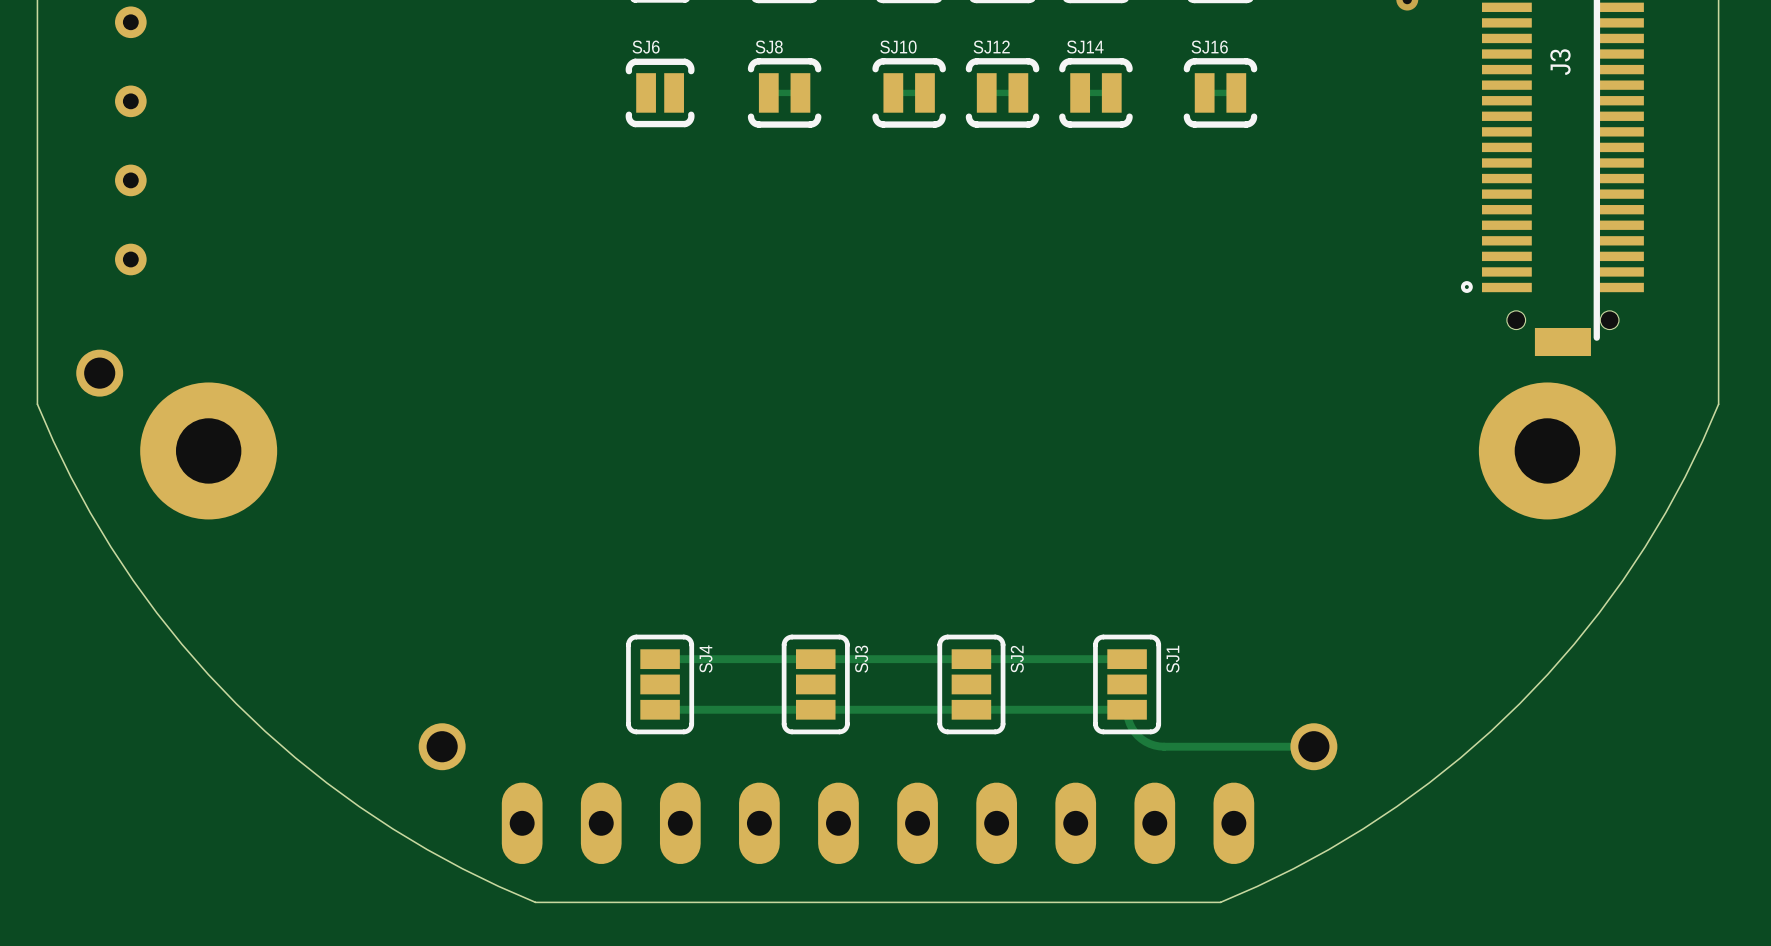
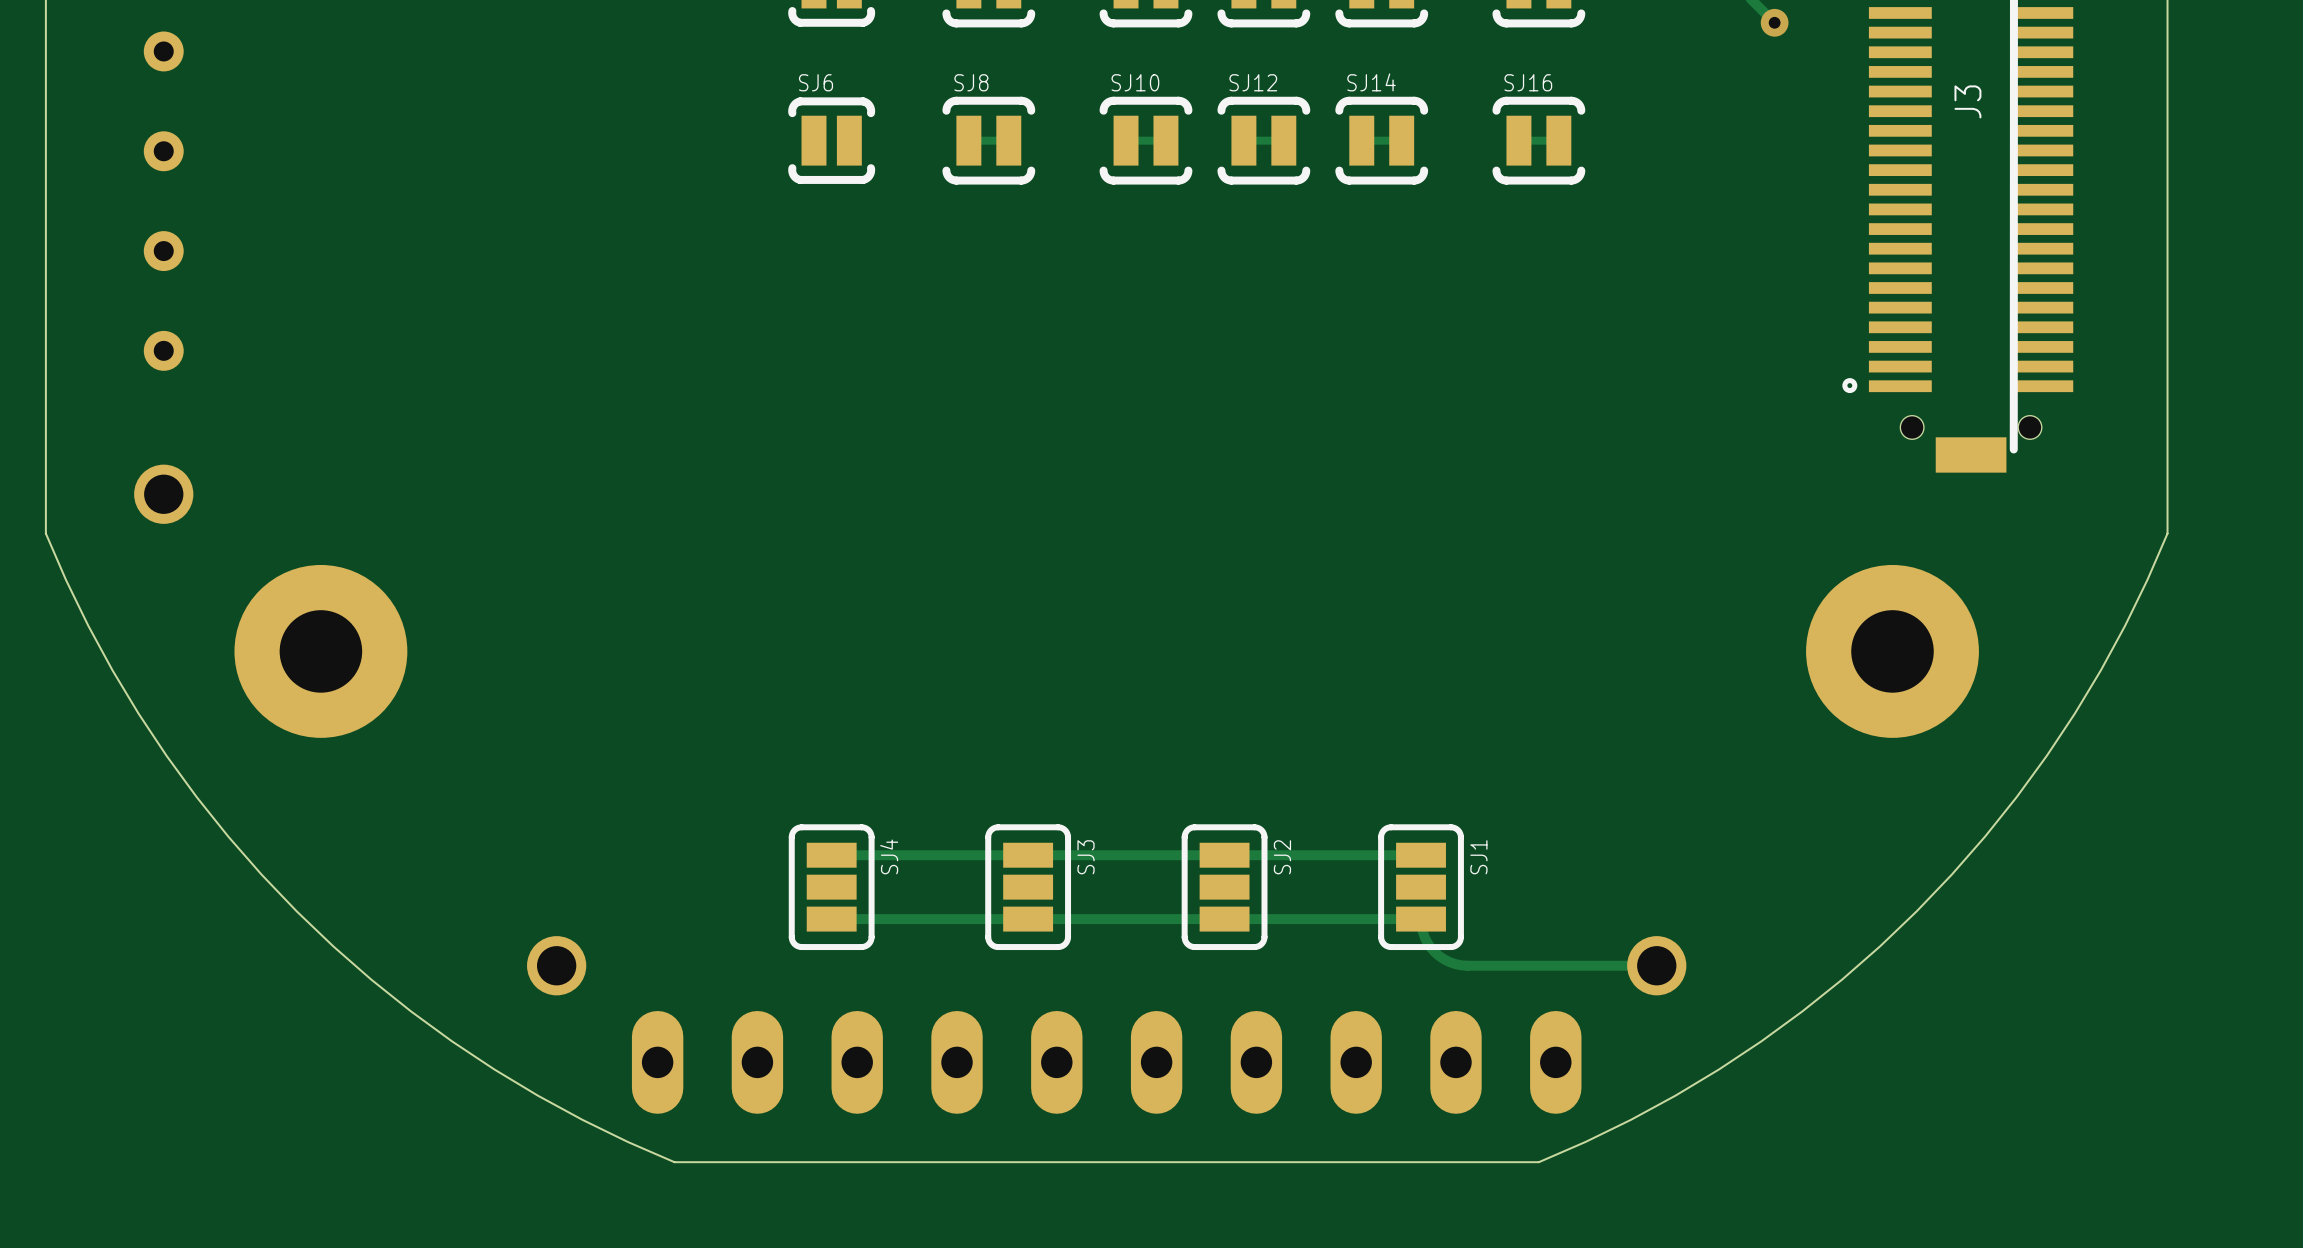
part position: (99, 373) -> (163, 494)
part position: (208, 450) -> (320, 651)
part position: (1547, 450) -> (1892, 651)

